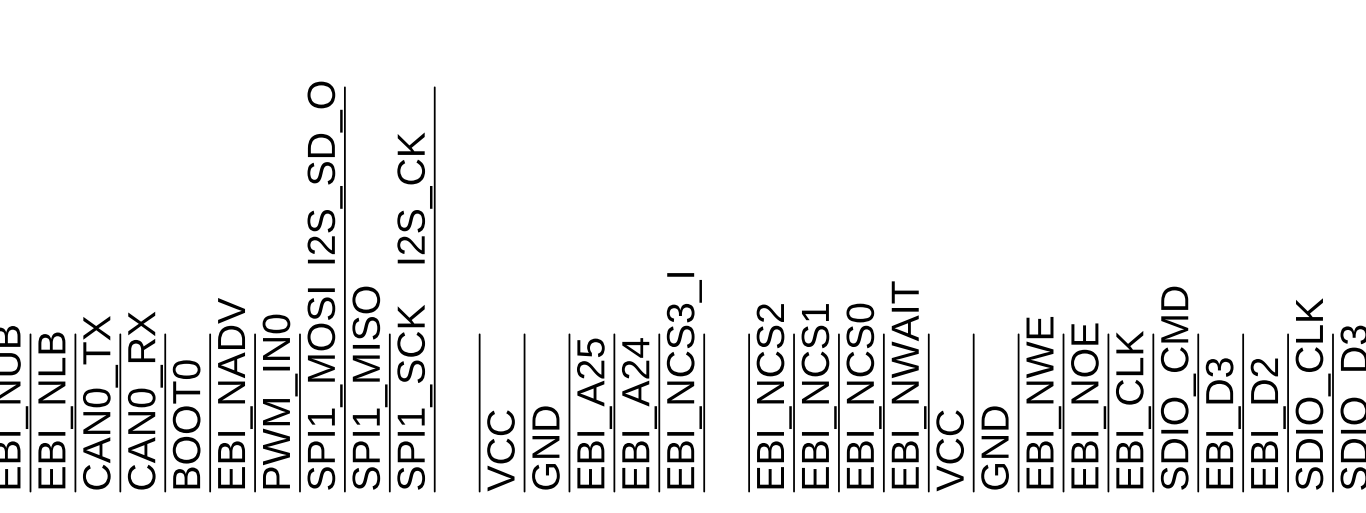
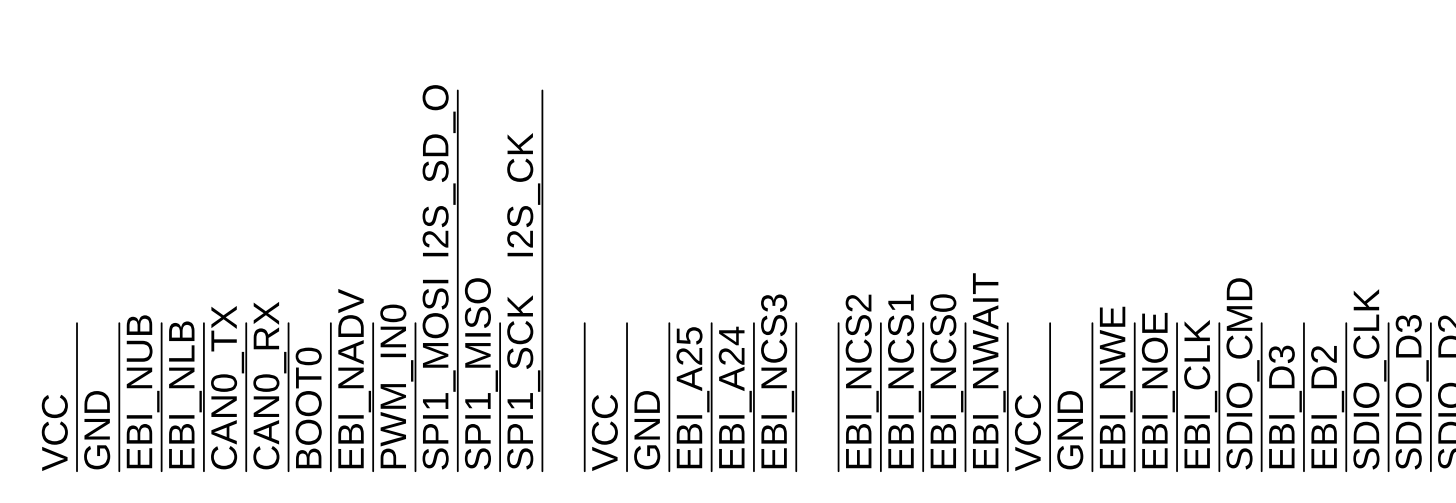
label: EBI_NCS3_I (684, 380) -> EBI_NCS3 (777, 381)

